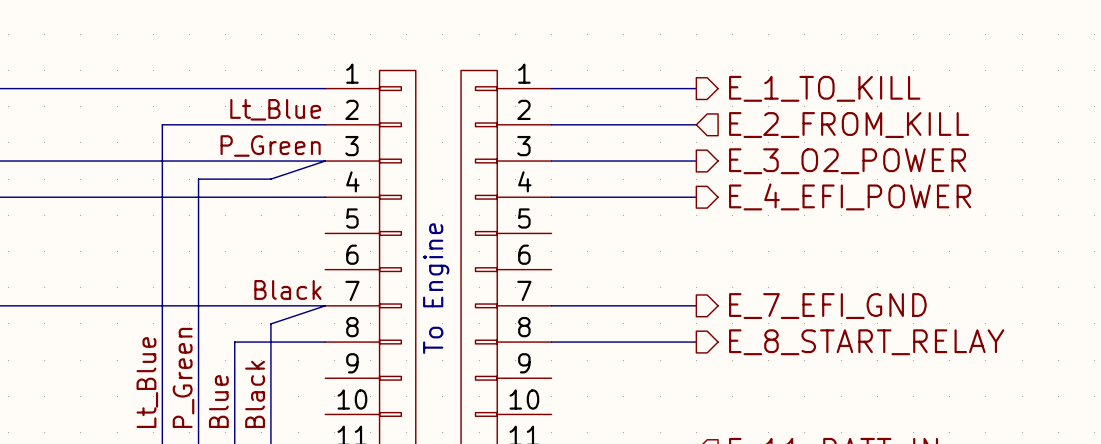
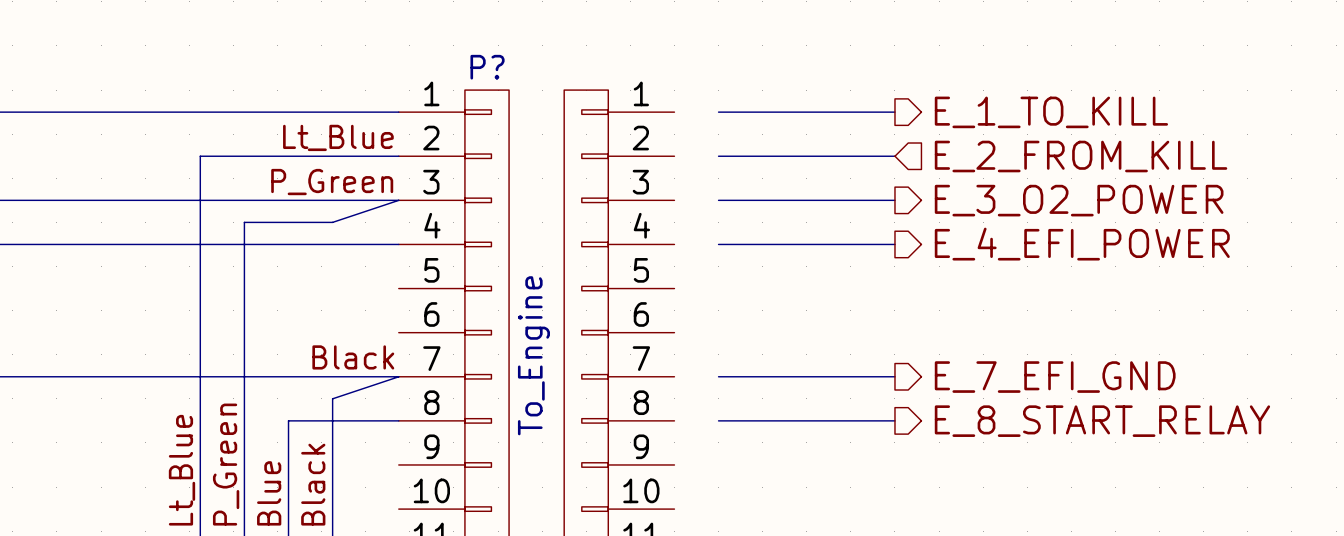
P? name: none -> P? (487, 67)
wire: (551, 88) (587, 88) -> (850, 112) (894, 112)
hierarchical label position: E_1_TO_KILL (824, 88) -> E_1_TO_KILL (1051, 112)
wire: (551, 124) (587, 124) -> (850, 156) (894, 156)
hierarchical label position: E_2_FROM_KILL (849, 125) -> E_2_FROM_KILL (1081, 156)
wire: (551, 161) (587, 161) -> (850, 200) (894, 200)
hierarchical label position: E_3_O2_POWER (847, 161) -> E_3_O2_POWER (1079, 200)
hierarchical label position: E_4_EFI_POWER (850, 196) -> E_4_EFI_POWER (1082, 244)
wire: (551, 197) (587, 197) -> (850, 244) (894, 244)
P? value: To Engine (436, 288) -> To_Engine (533, 355)
wire: (551, 305) (587, 305) -> (850, 376) (894, 376)
hierarchical label position: E_7_EFI_GND (827, 306) -> E_7_EFI_GND (1055, 377)
wire: (551, 342) (587, 342) -> (850, 420) (894, 420)
hierarchical label position: E_8_START_RELAY (866, 342) -> E_8_START_RELAY (1102, 421)

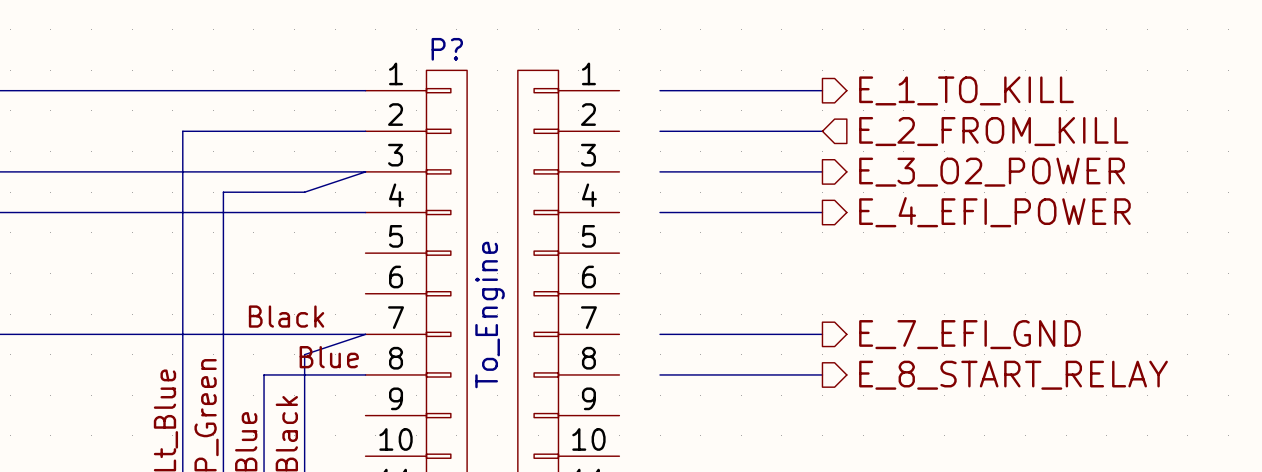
label: Lt_Blue (338, 137) -> none
label: P_Green (332, 182) -> none
label position: Black (353, 357) -> Black (286, 316)
label: none -> Blue (329, 357)

